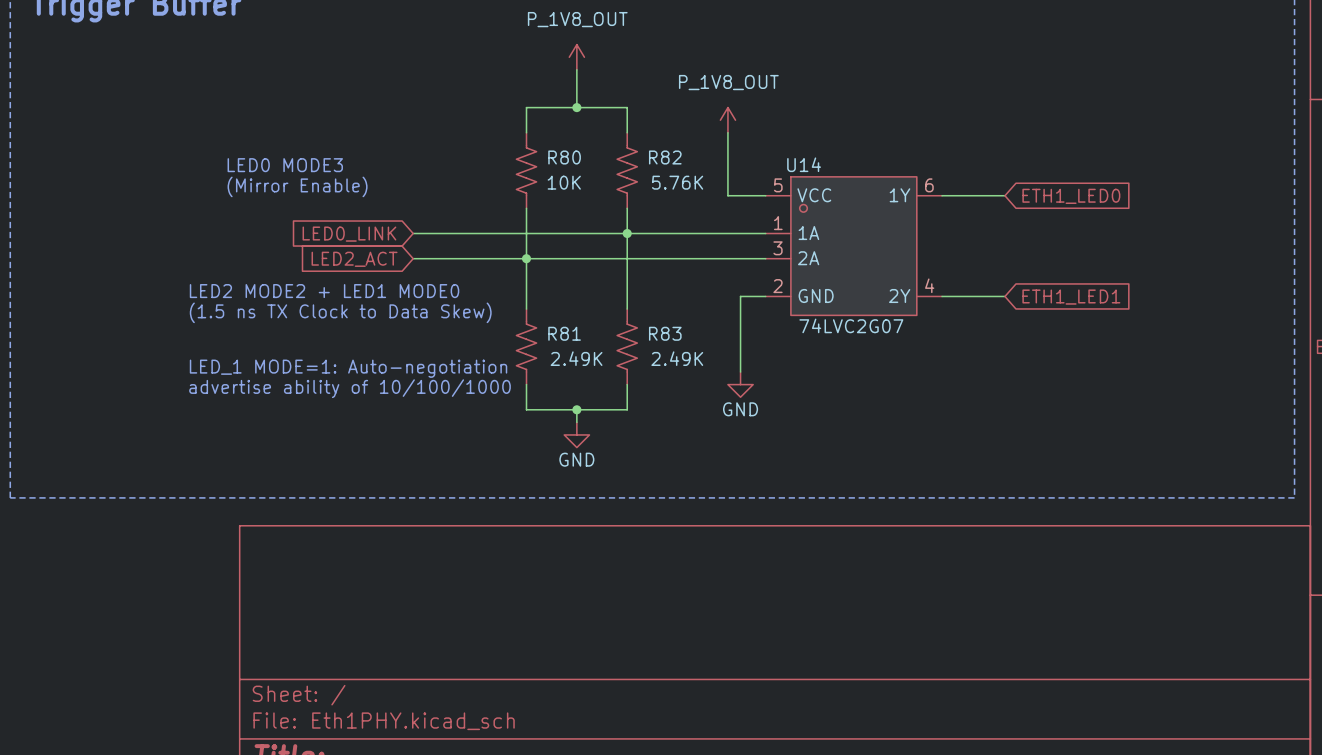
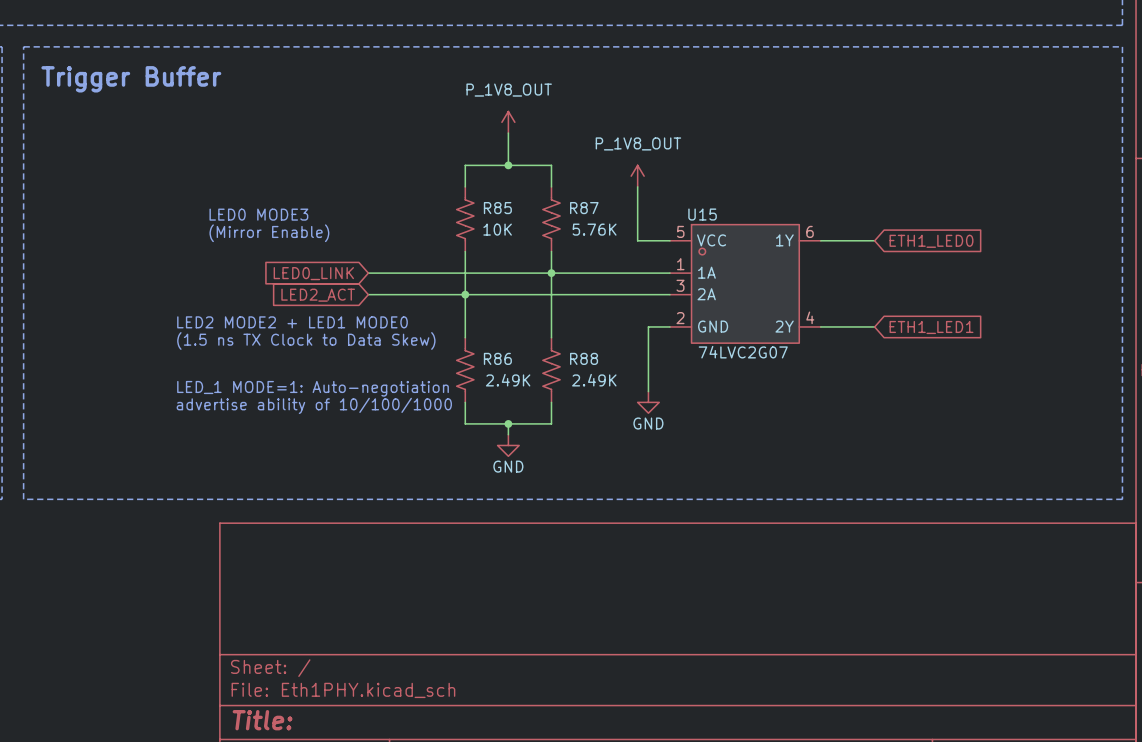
R80 name: R80 (564, 157) -> R85 (497, 208)
R82 name: R82 (665, 157) -> R87 (584, 208)
U14 name: U14 (804, 164) -> U15 (702, 214)
R81 name: R81 (564, 333) -> R86 (497, 358)
R83 name: R83 (665, 333) -> R88 (584, 358)

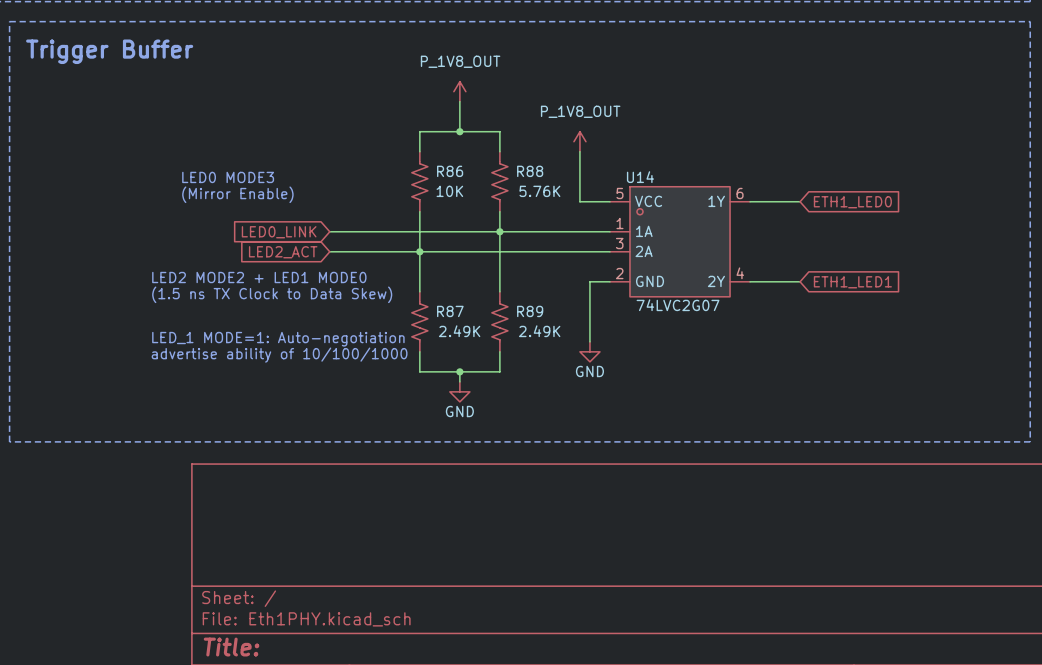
R85 name: R85 (497, 208) -> R86 (450, 171)
R87 name: R87 (584, 208) -> R88 (530, 171)
U15 name: U15 (702, 214) -> U14 (640, 177)
R86 name: R86 (497, 358) -> R87 (450, 311)
R88 name: R88 (584, 358) -> R89 (530, 311)

